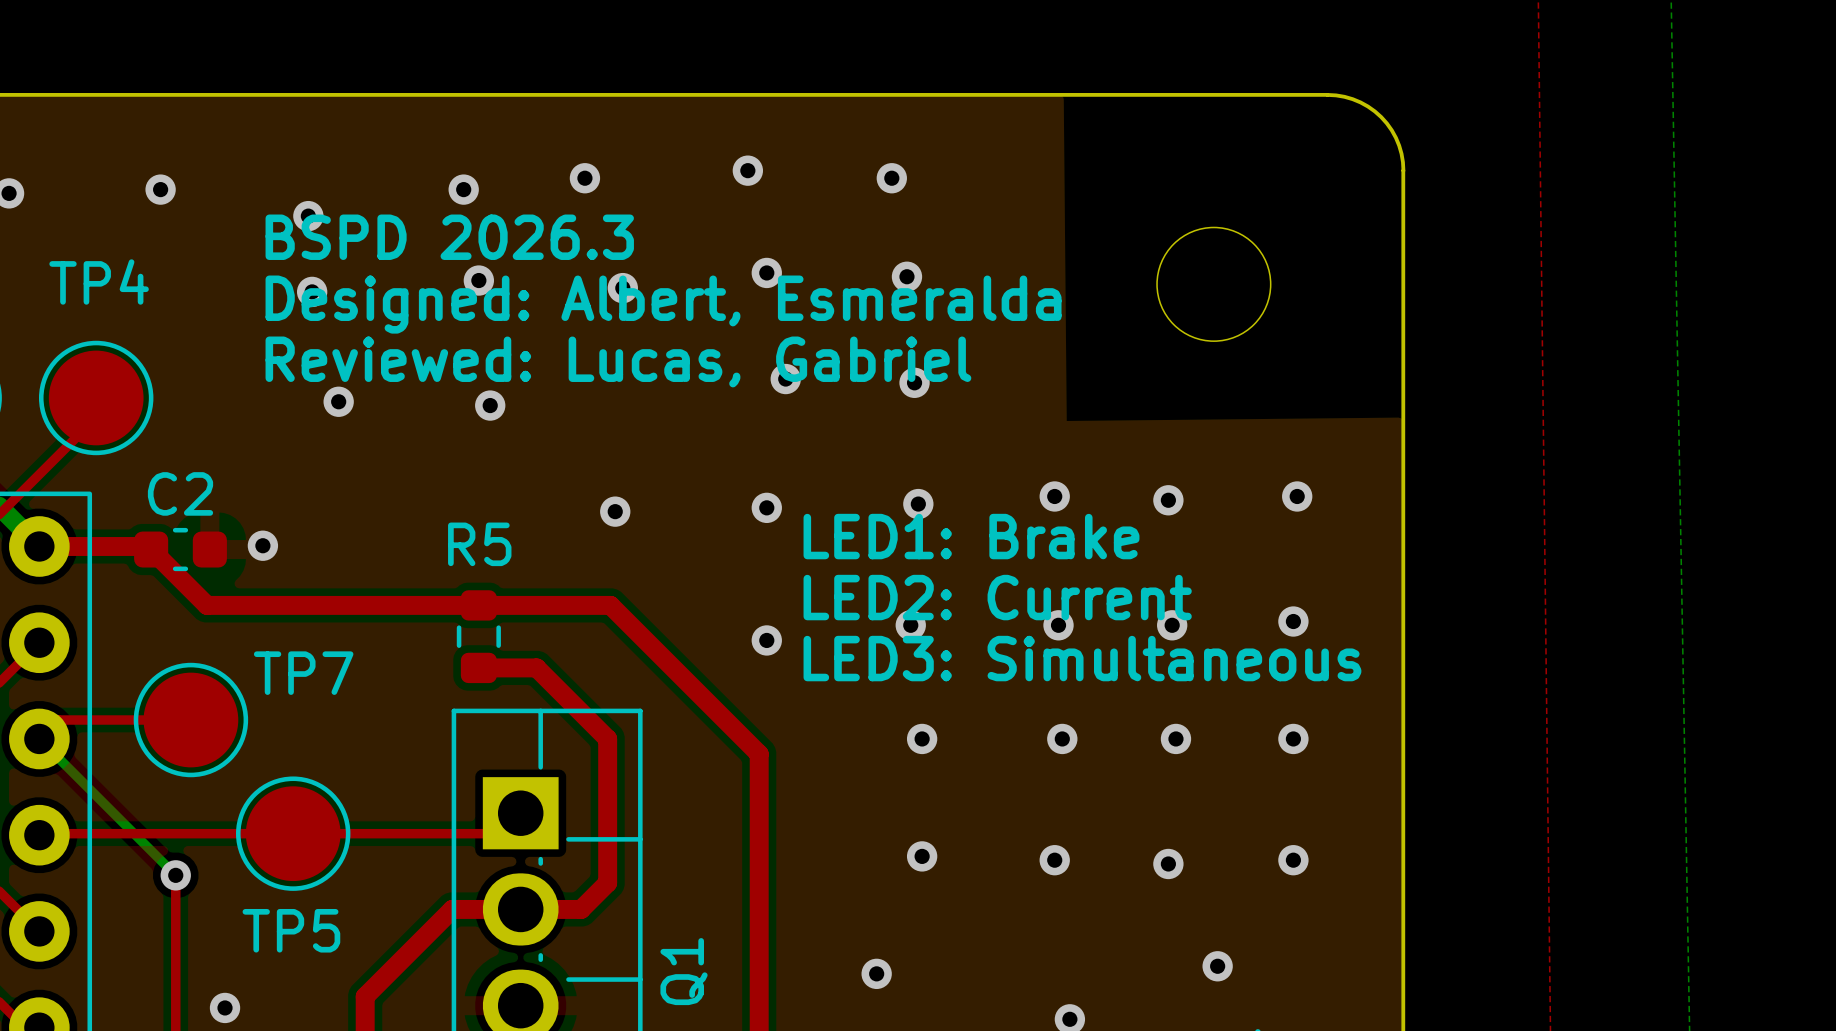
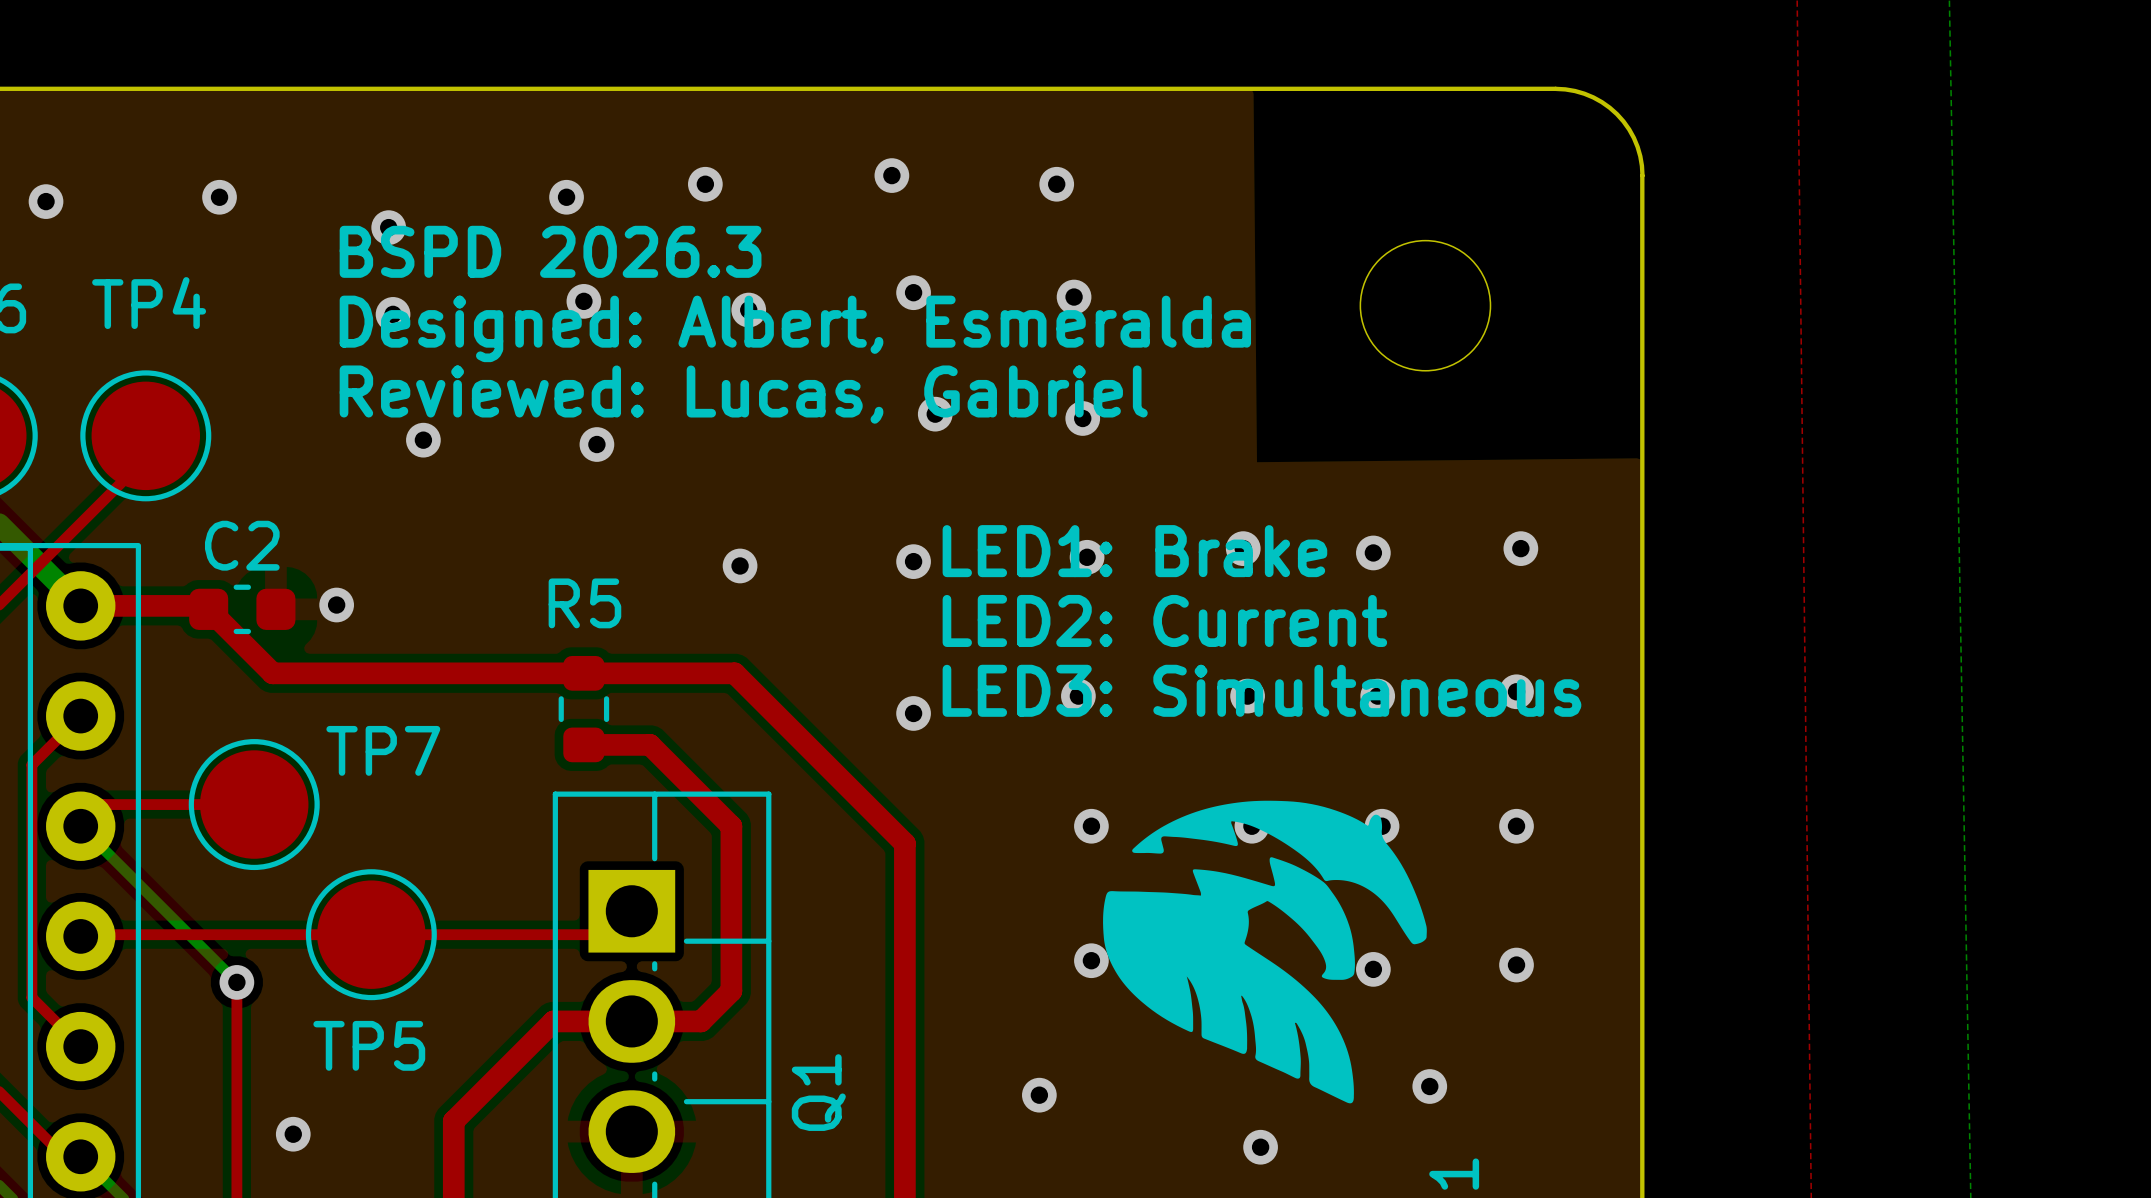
text position: LED1: Brake (971, 536) -> LED1: Brake (1134, 551)
text position: LED2: Current (997, 597) -> LED2: Current (1164, 620)
text position: LED3: Simultaneous (1082, 658) -> LED3: Simultaneous (1261, 690)
drawing: none -> [1103, 800, 1427, 1104]

